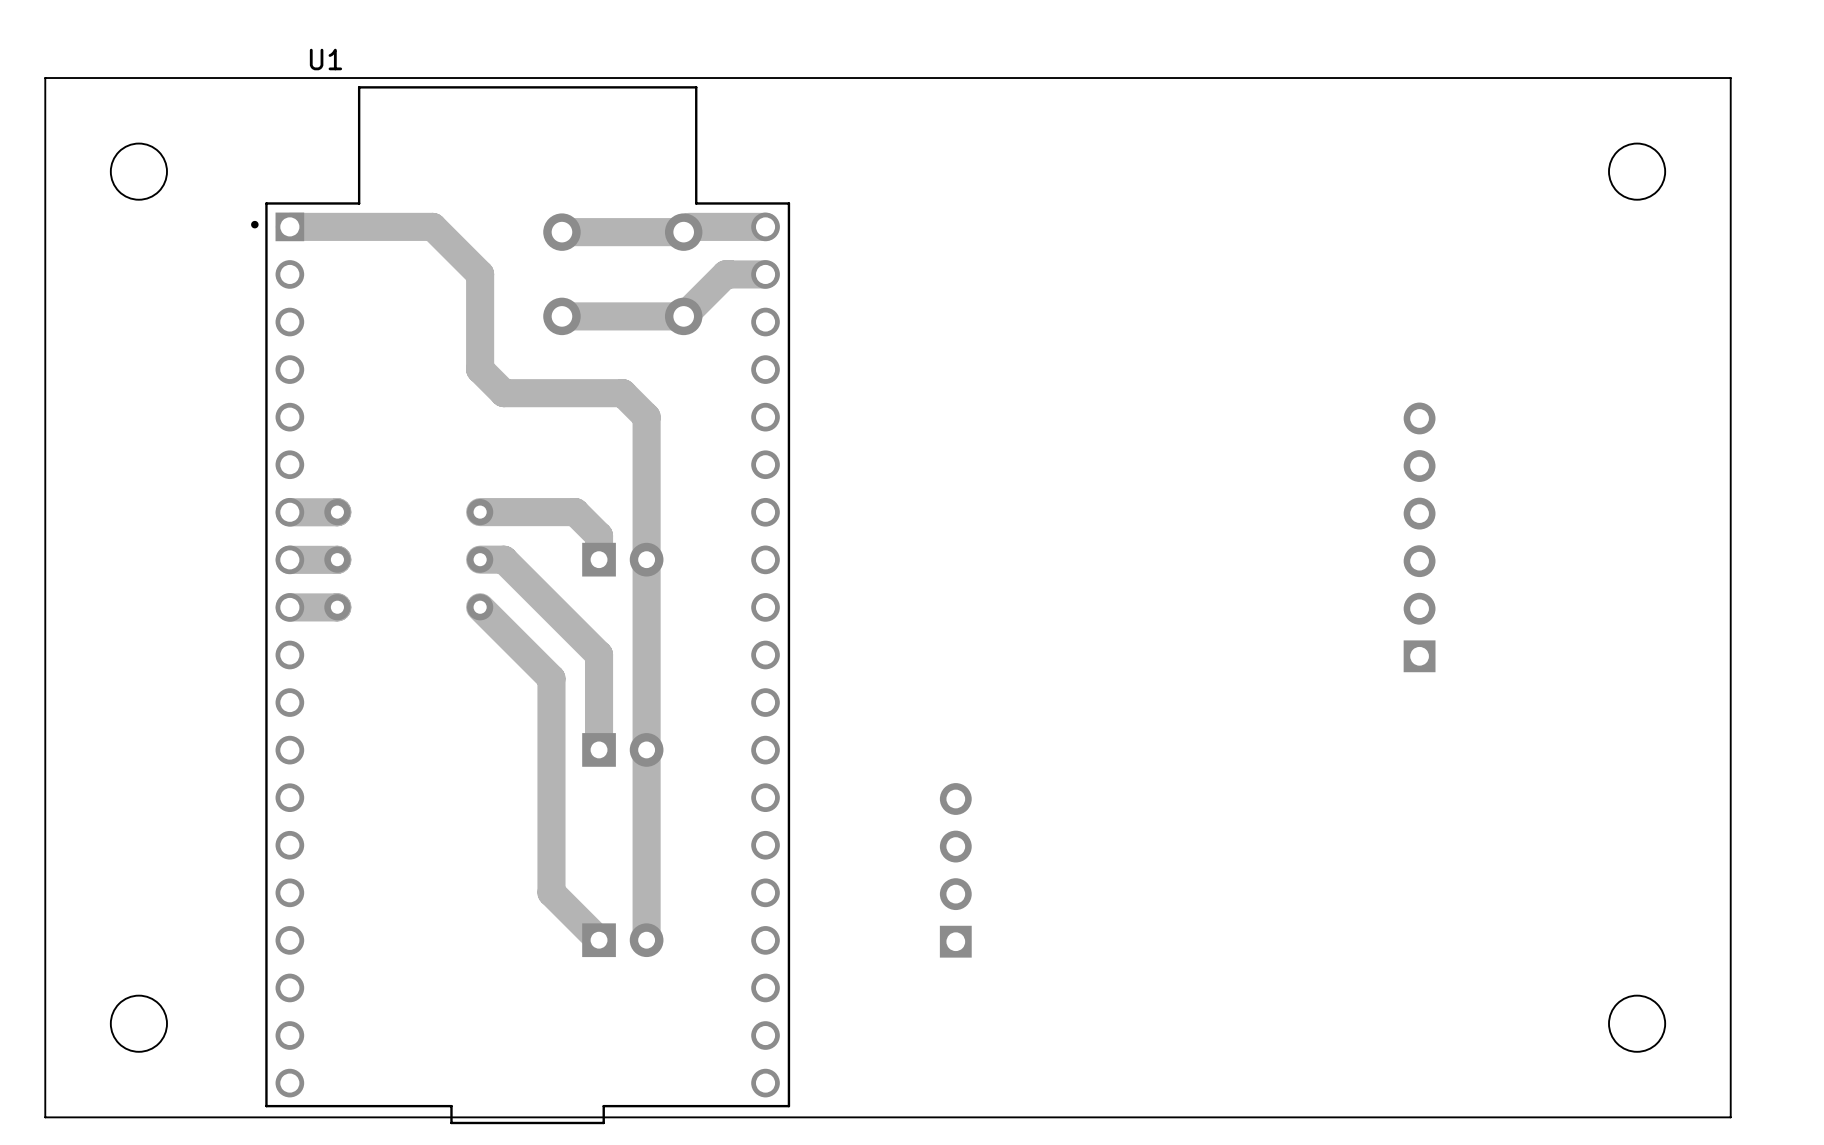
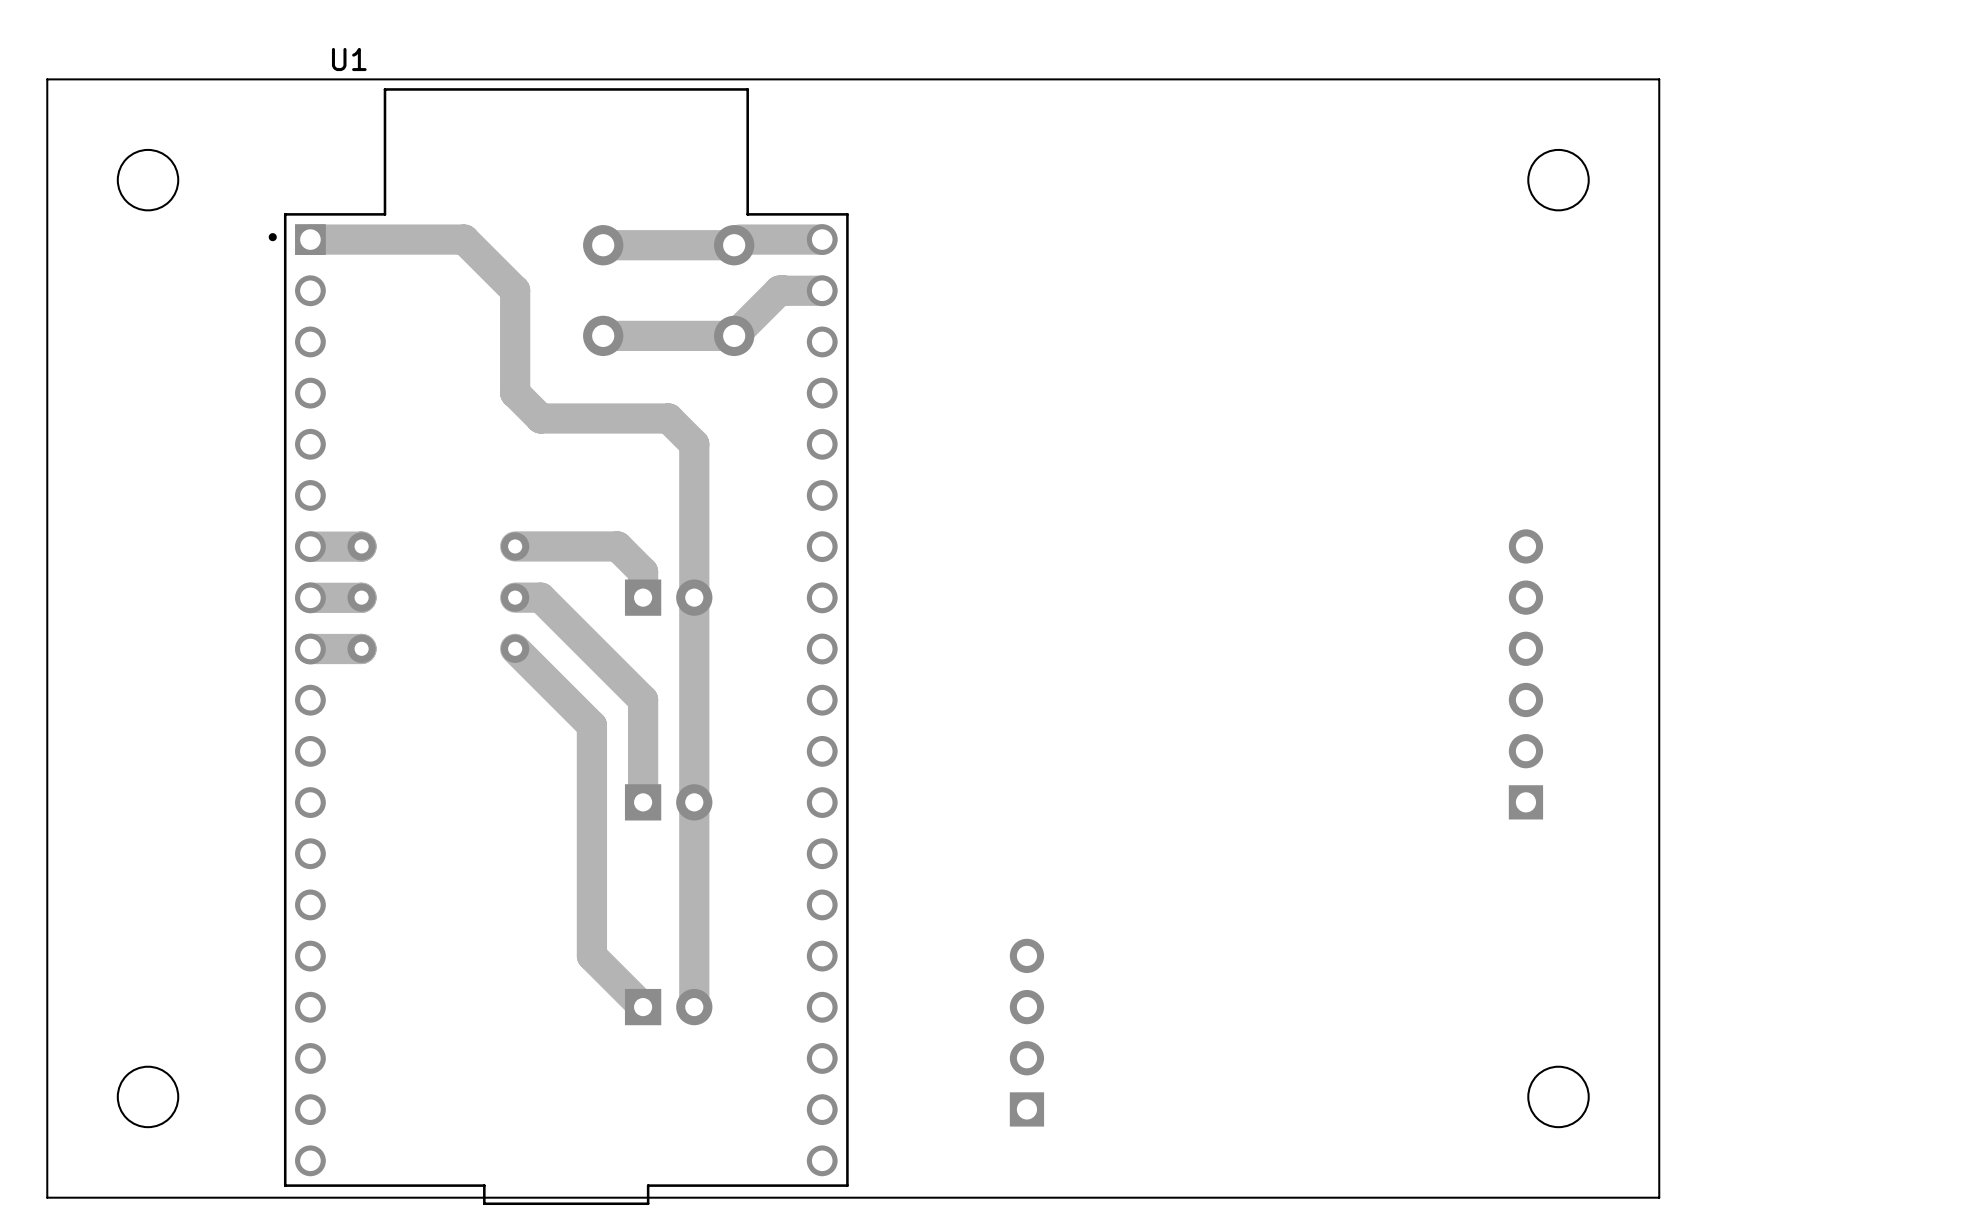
board edge: (1543, 78) (1730, 78) (1730, 1117) (1543, 1117) -> (1659, 79) (1659, 1197)
round board edge position: (1637, 171) -> (1558, 180)
part position: (1419, 537) -> (1525, 674)
part position: (955, 870) -> (1026, 1032)
round board edge position: (1637, 1023) -> (1558, 1096)

